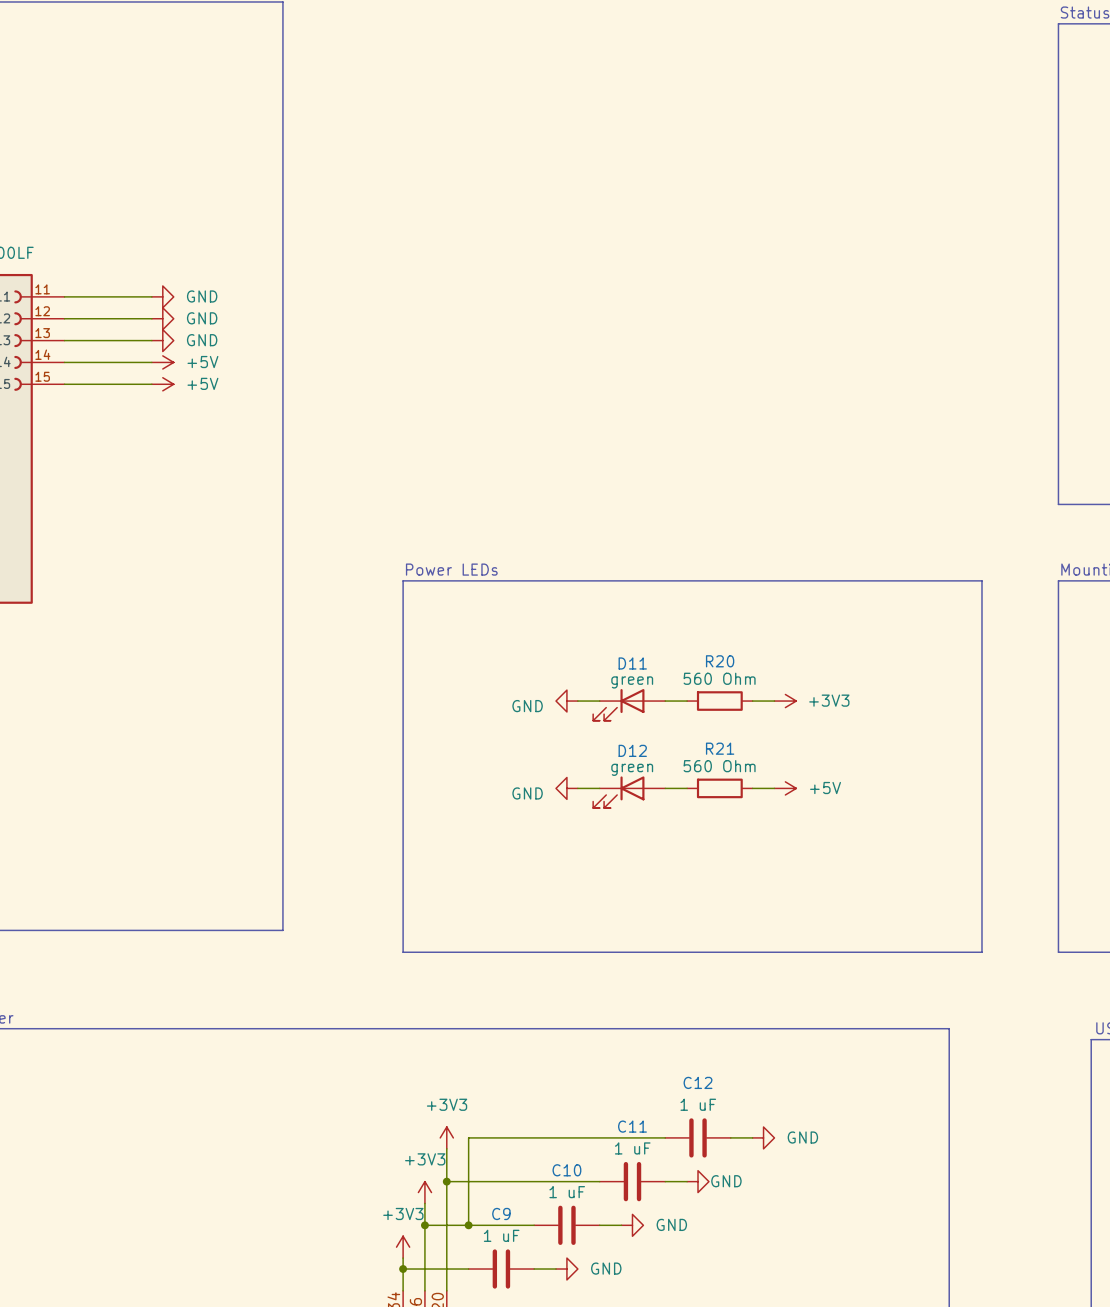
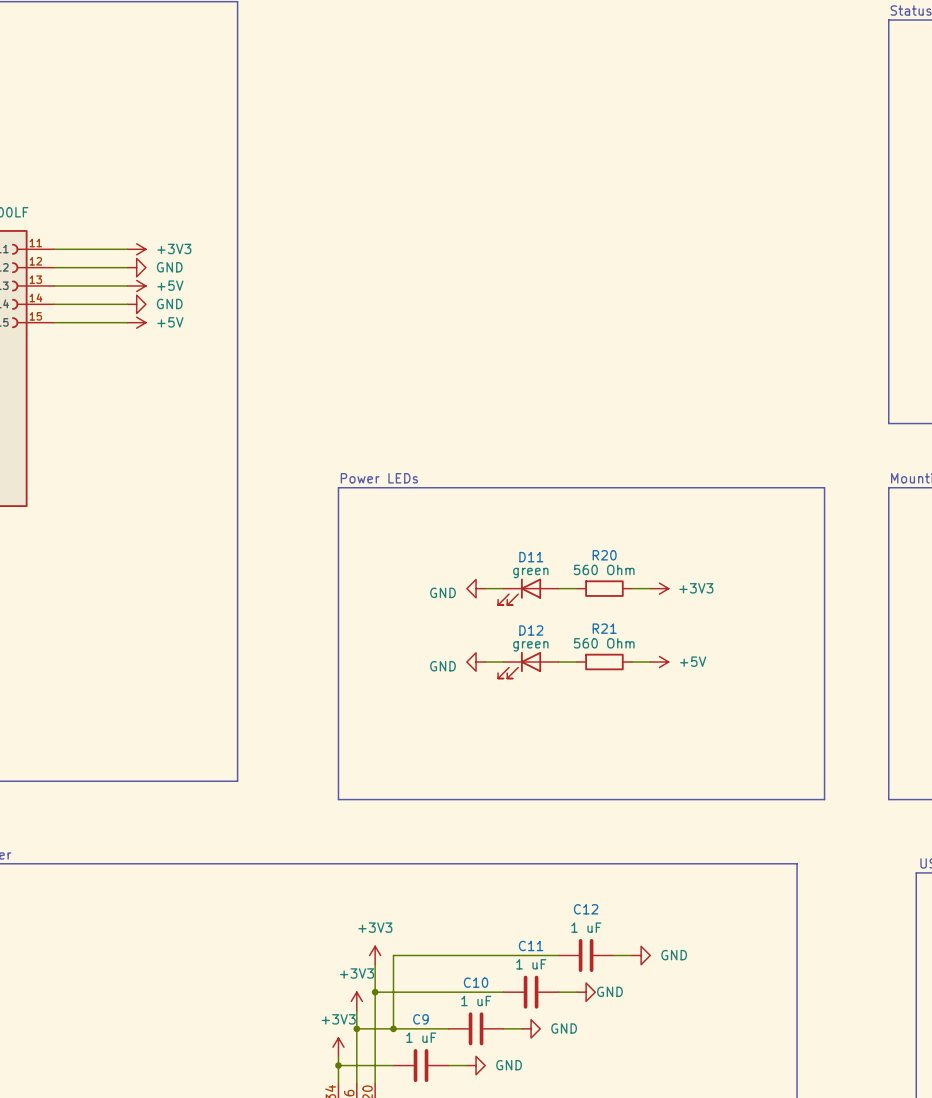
power symbol: GND (162, 296) -> +3V3 (136, 249)
power symbol: GND (162, 340) -> +5V (136, 285)
power symbol: +5V (162, 362) -> GND (136, 304)

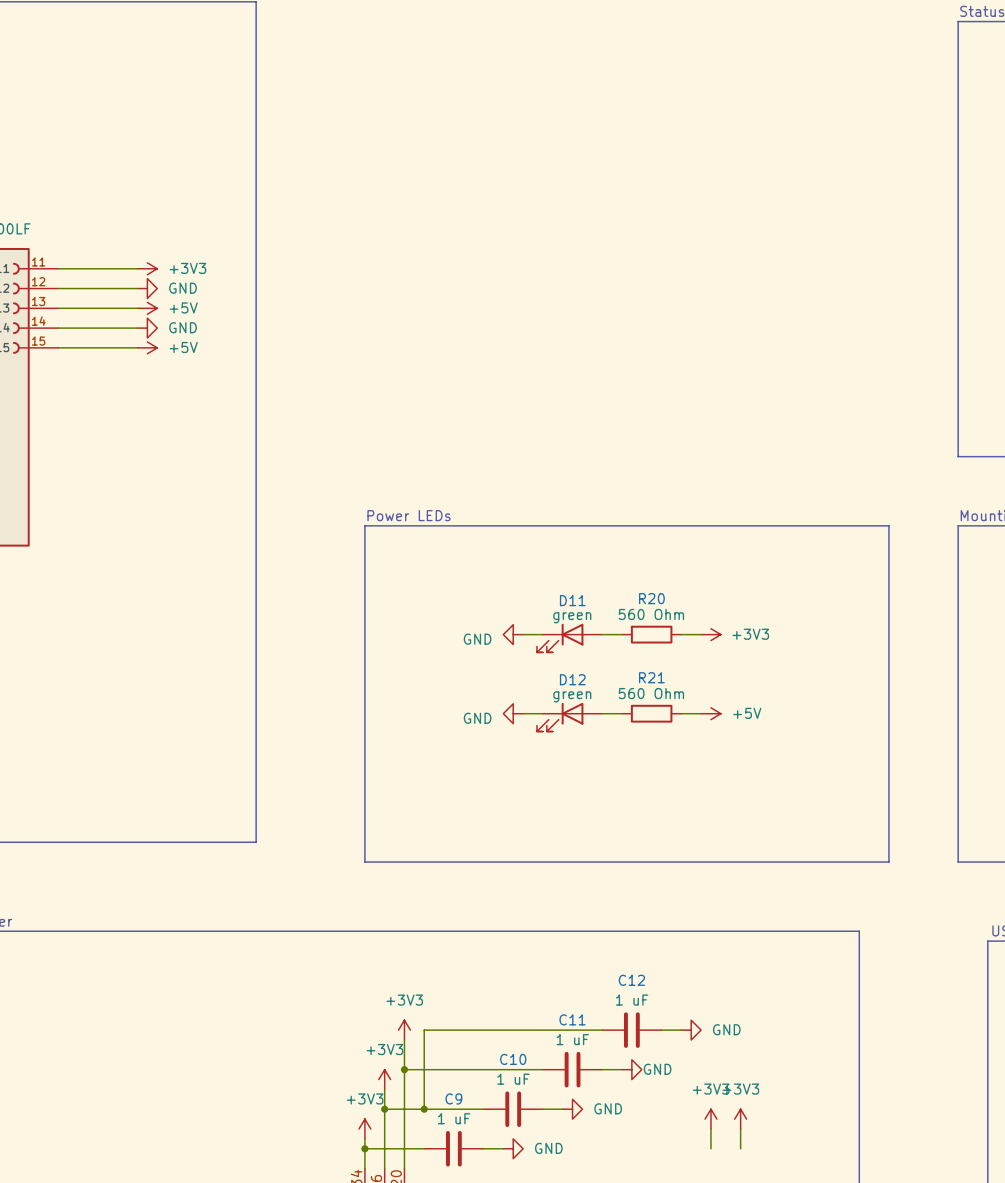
power symbol: none -> +3V3 (710, 1119)
power symbol: none -> +3V3 (740, 1119)
wire: none -> (710, 1129) (710, 1148)
wire: none -> (740, 1129) (740, 1148)

